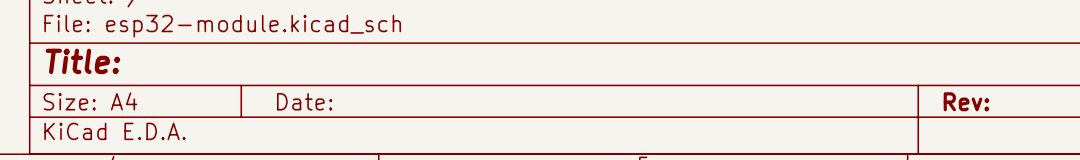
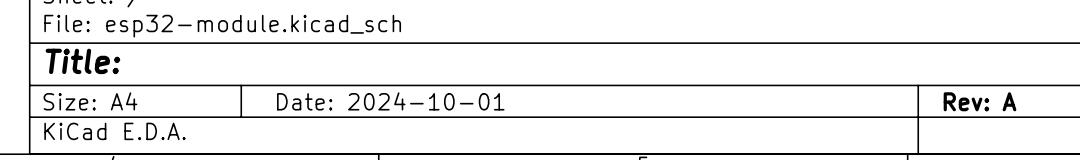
title block: Date: (304, 101) -> Date: 2024-10-01 (390, 101)
title block: Rev: (966, 101) -> Rev: A (980, 101)

